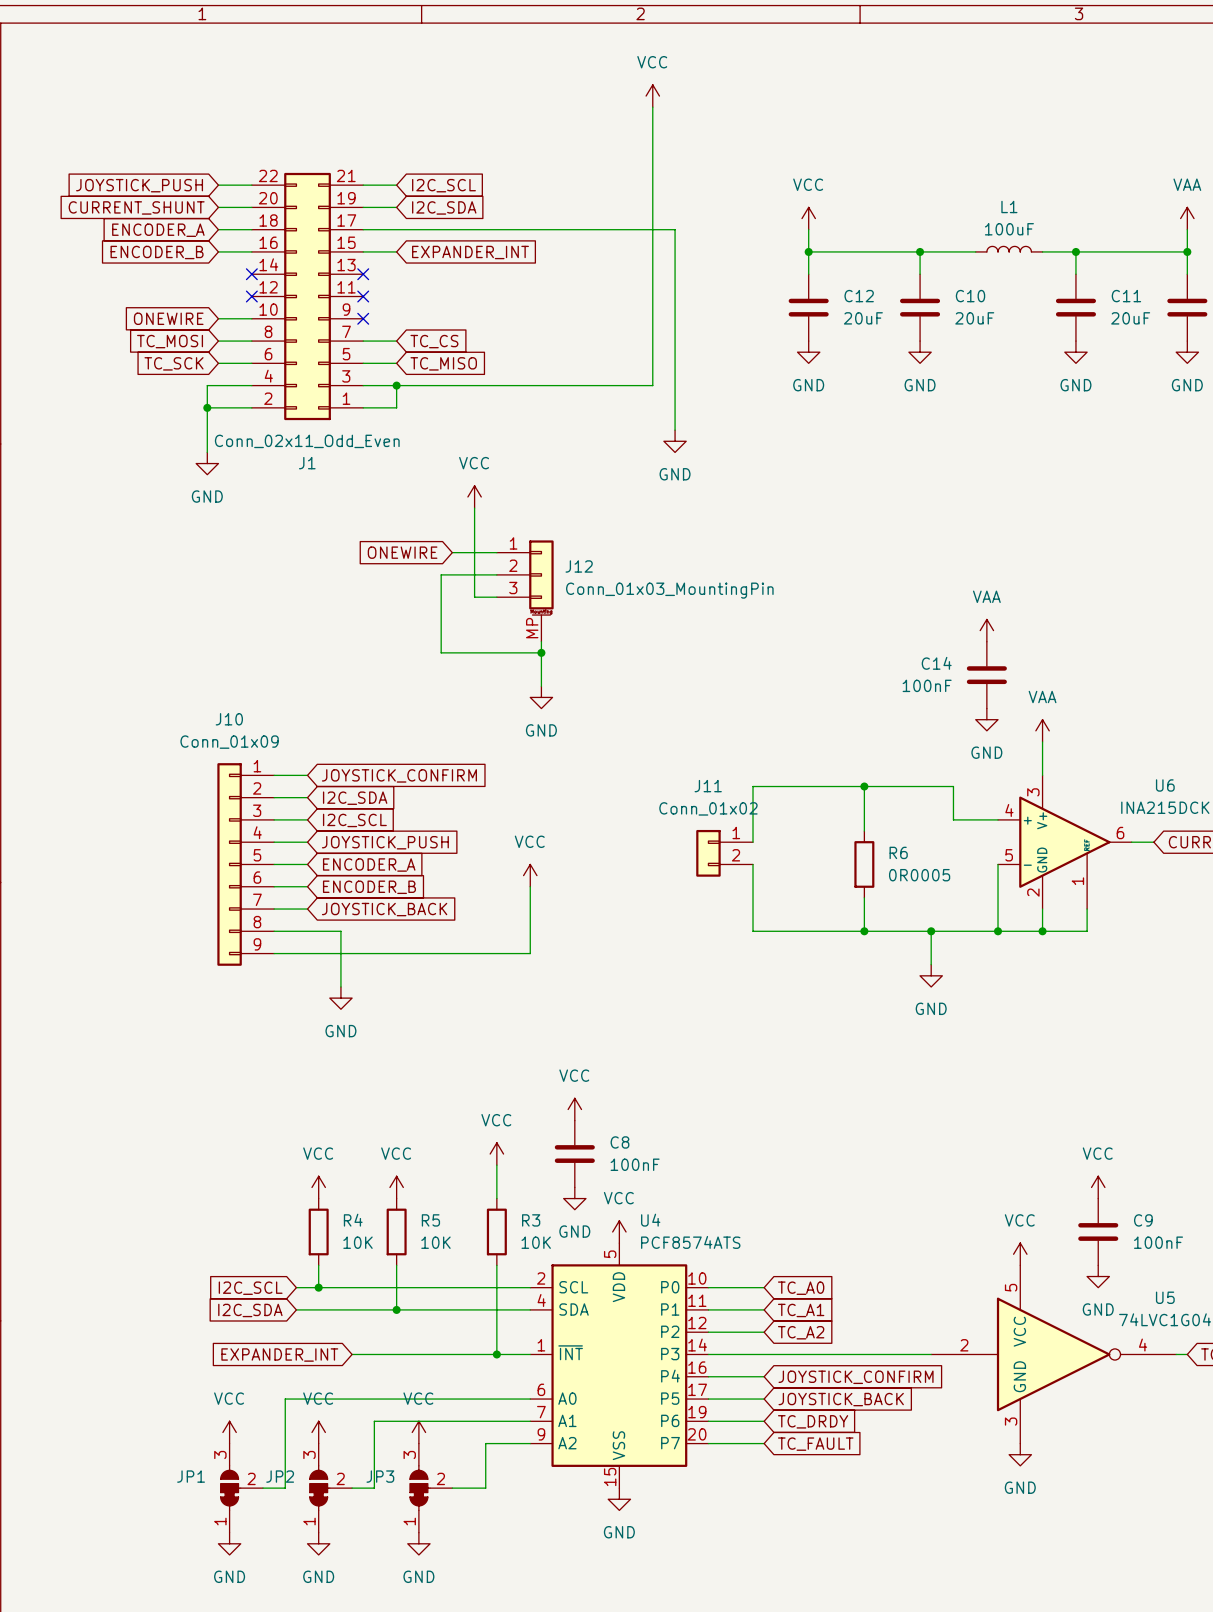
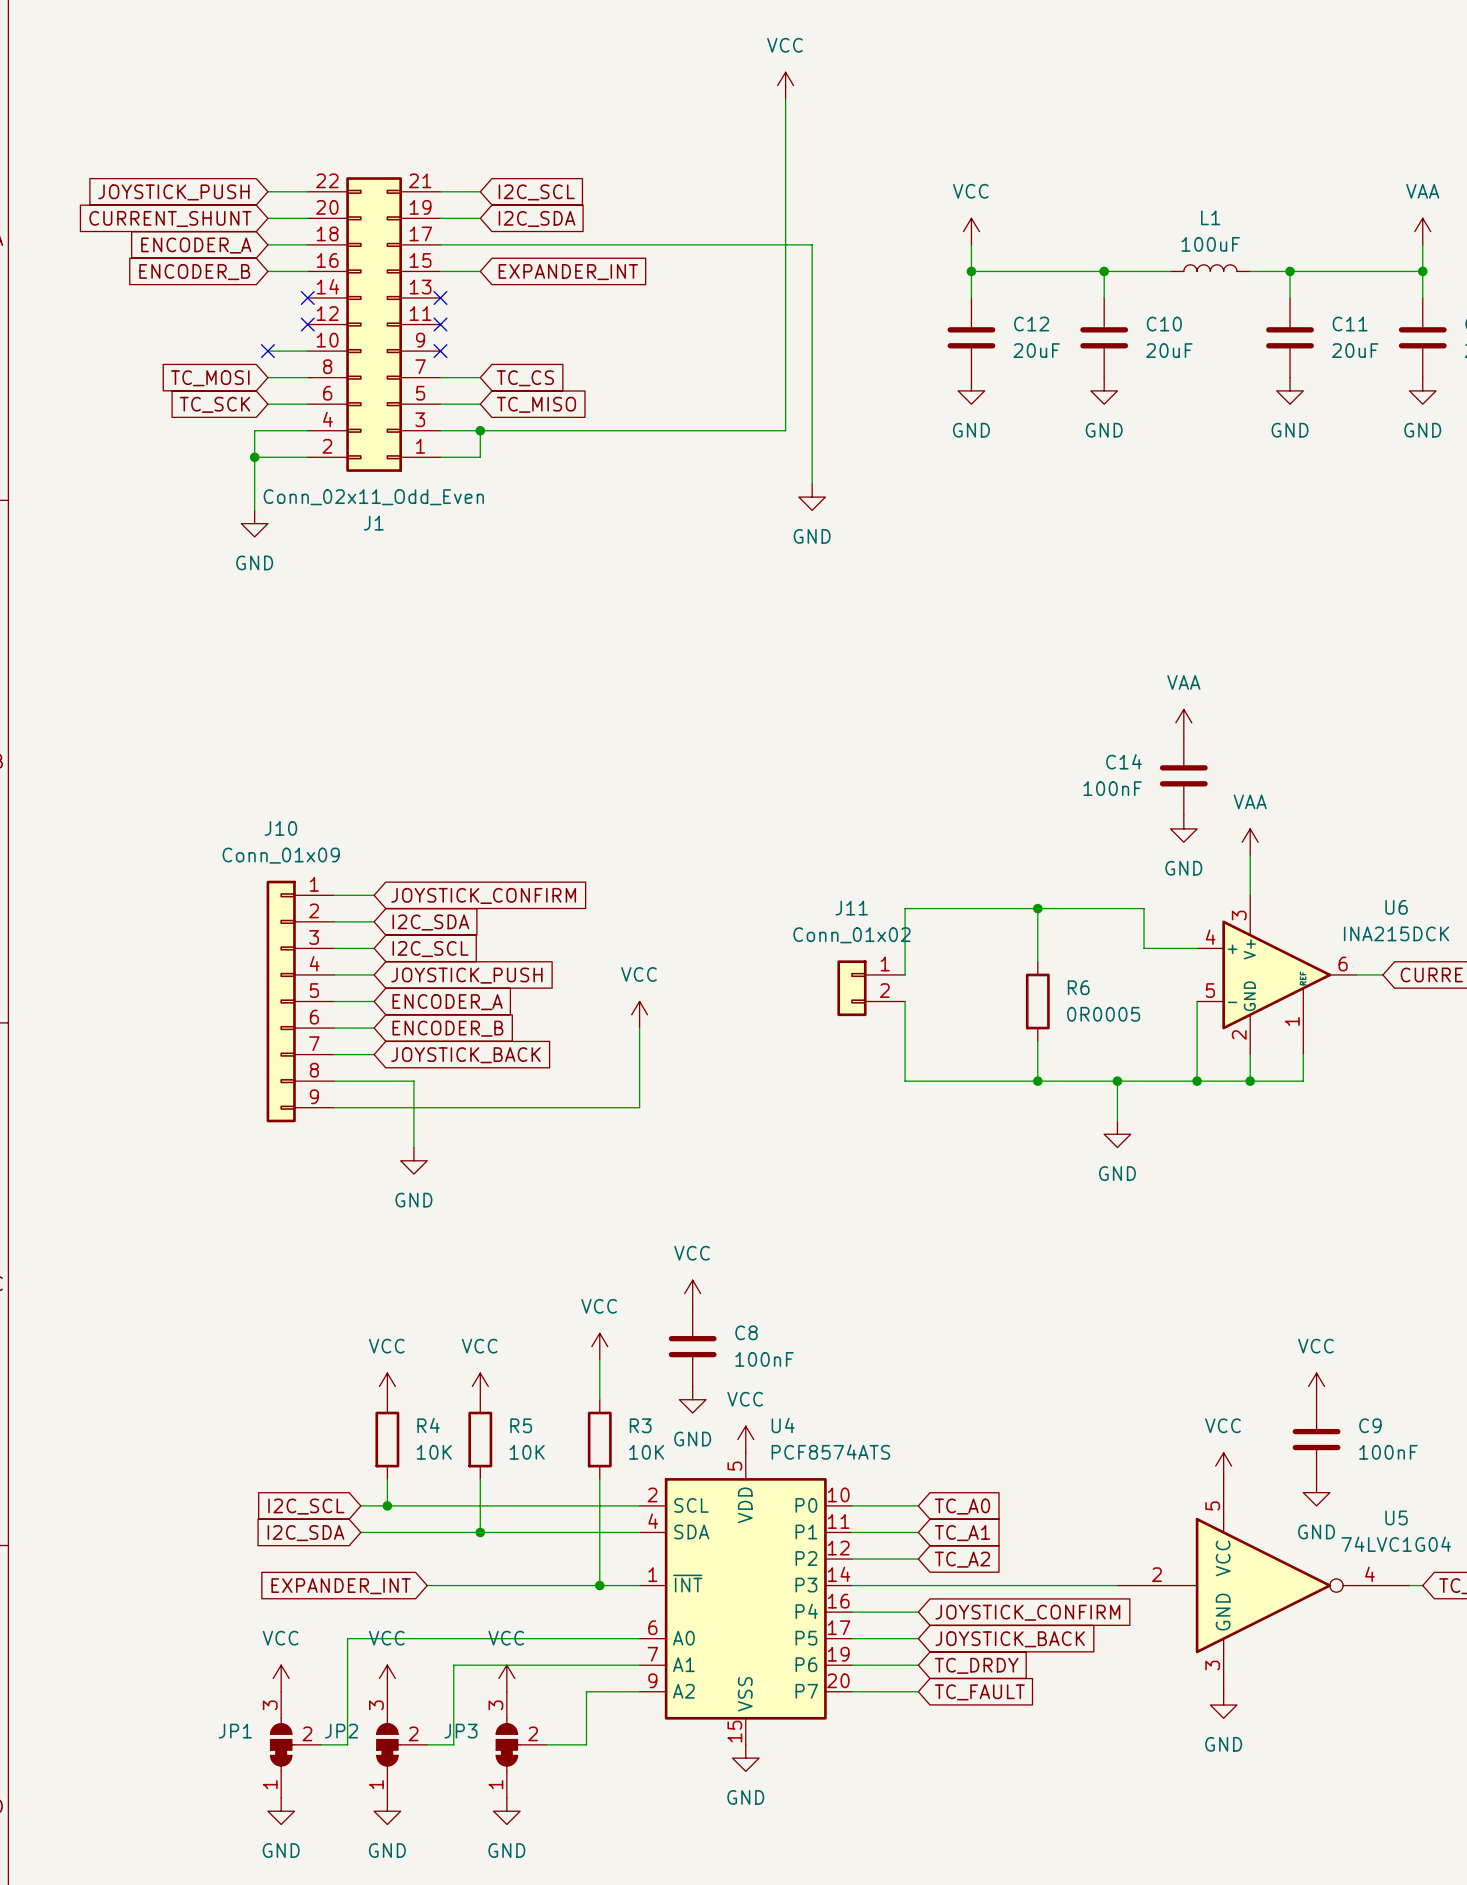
global label: ONEWIRE (168, 318) -> none
no-connect mark: none -> (267, 351)
power symbol: VCC (474, 496) -> none
wire: (474, 508) (474, 597) (496, 597) -> none
global label: ONEWIRE (402, 552) -> none
wire: (452, 552) (496, 552) -> none
wire: (496, 574) (441, 574) (441, 652) (541, 652) -> none
J12: Conn_01x03_MountingPin (525, 591) -> none
wire: (541, 641) (541, 686) -> none
junction: (541, 652) -> none
power symbol: GND (541, 697) -> none

